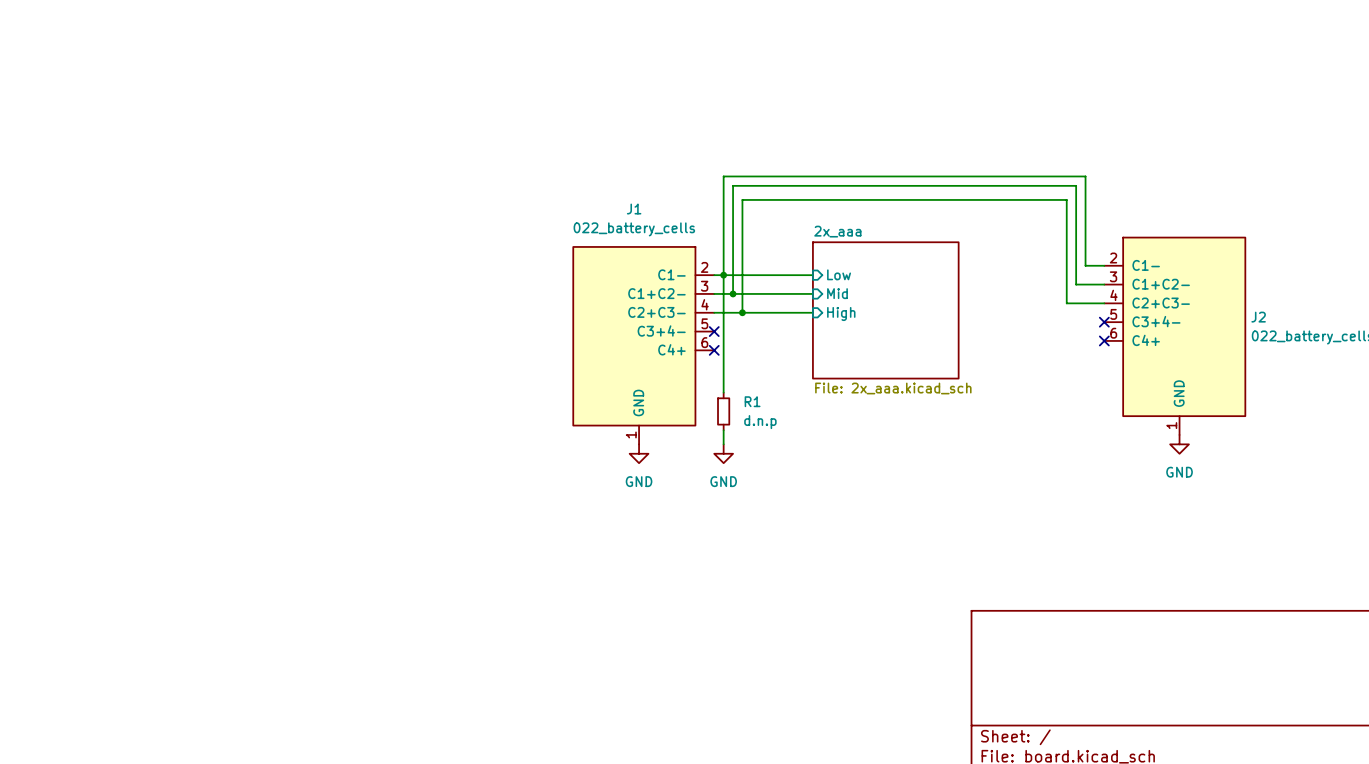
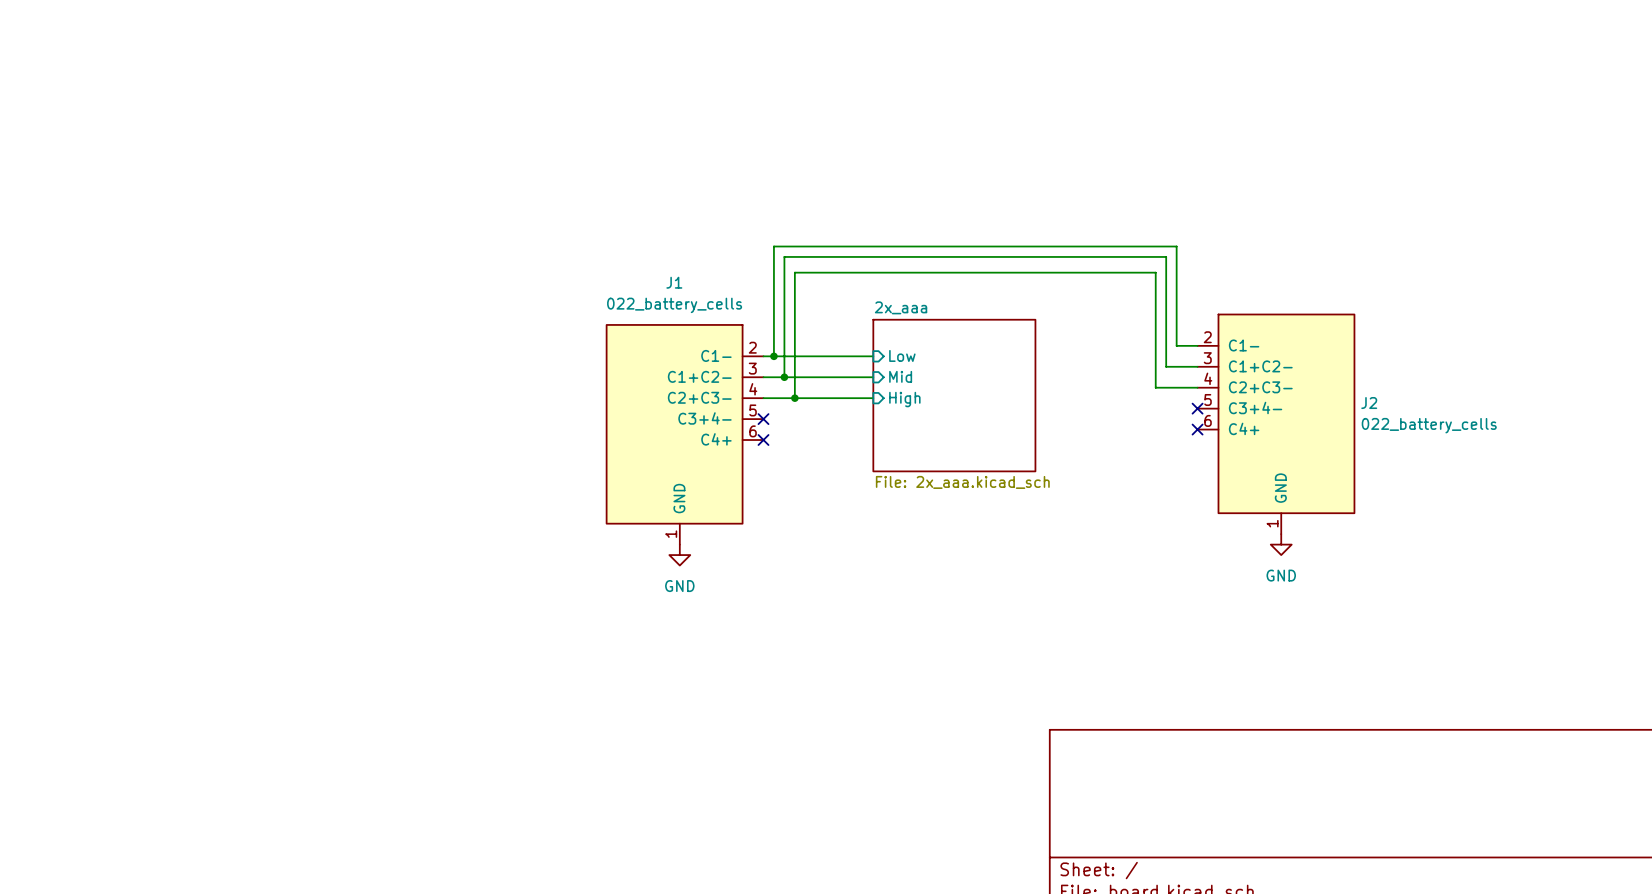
wire: (723, 275) (723, 392) -> none
R1: d.n.p (723, 411) -> none
wire: (723, 430) (723, 444) -> none
power symbol: GND (723, 453) -> none

